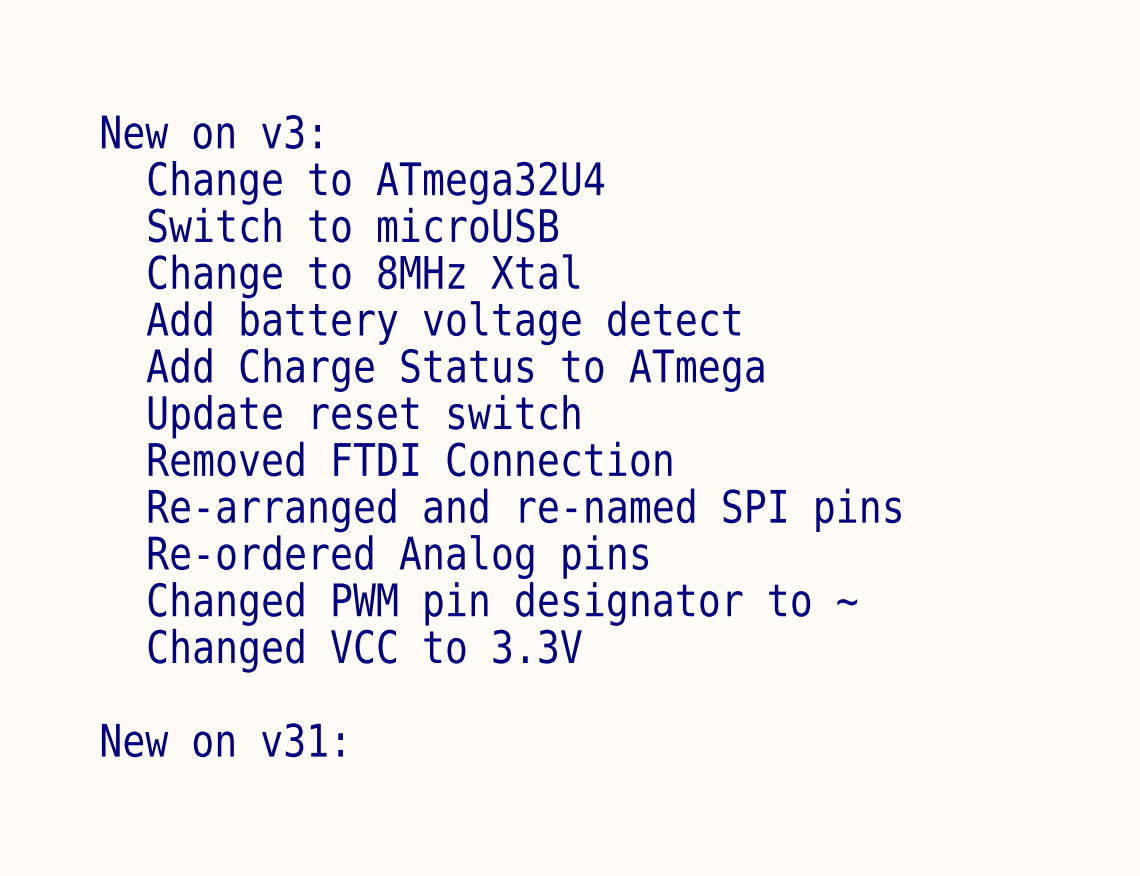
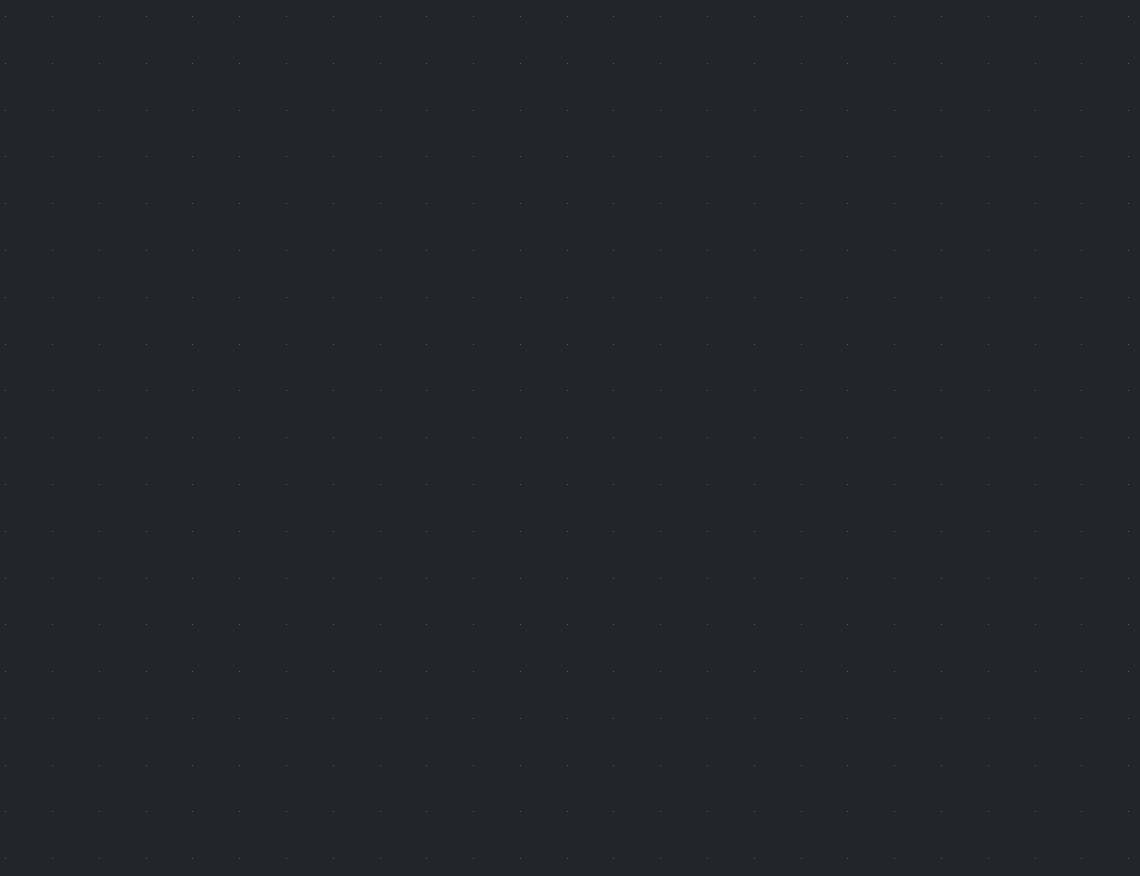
text: New on v3: (210, 131) -> none
text: Change to ATmega32U4 (376, 182) -> none
text: Switch to microUSB (353, 225) -> none
text: Change to 8MHz Xtal (363, 276) -> none
text: Add battery voltage detect (443, 323) -> none
text: Add Charge Status to ATmega (455, 370) -> none
text: Update reset switch (364, 416) -> none
text: Removed FTDI Connection (410, 459) -> none
text: Re-arranged and re-named SPI pins (524, 510) -> none
text: Re-ordered Analog pins (398, 557) -> none
text: Changed PWM pin designator to ~ (502, 603) -> none
text: Changed VCC to 3.3V (365, 650) -> none
text: New on v31: (222, 740) -> none

